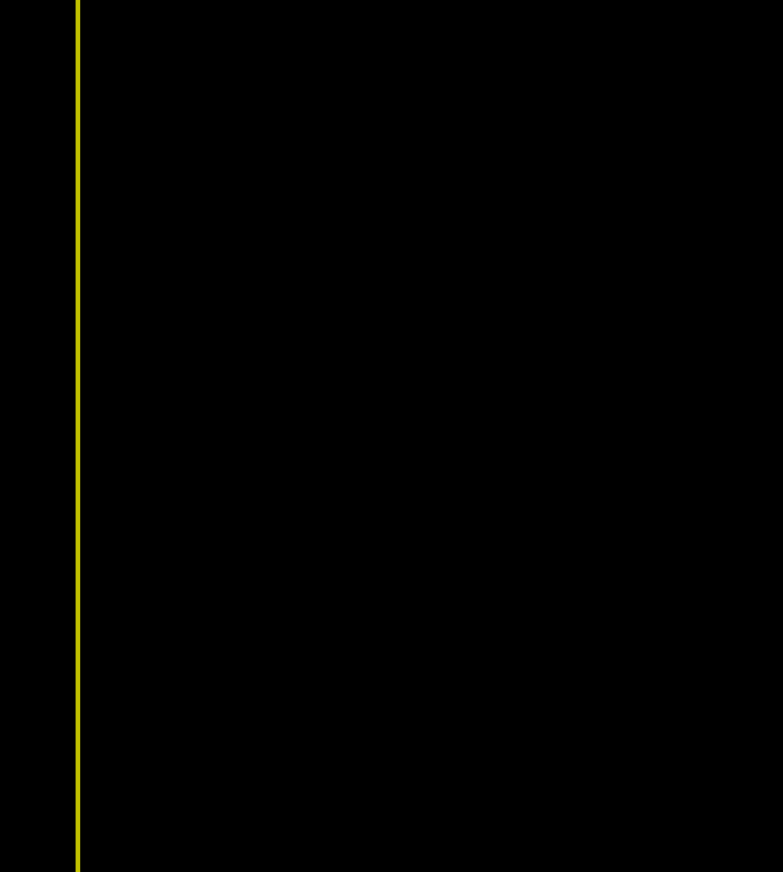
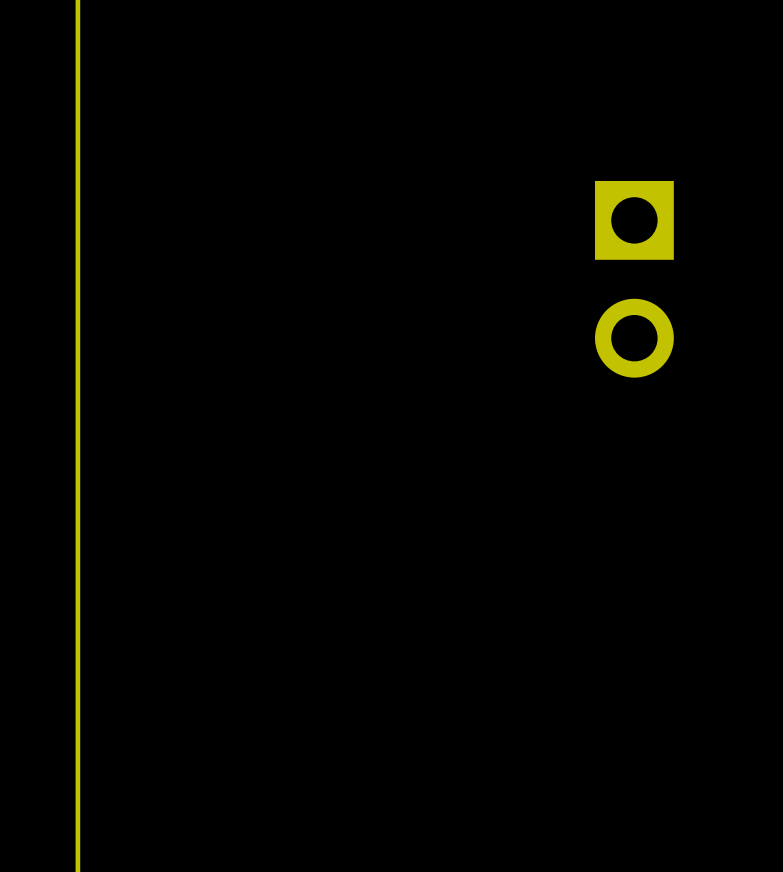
part: none -> (634, 279)

